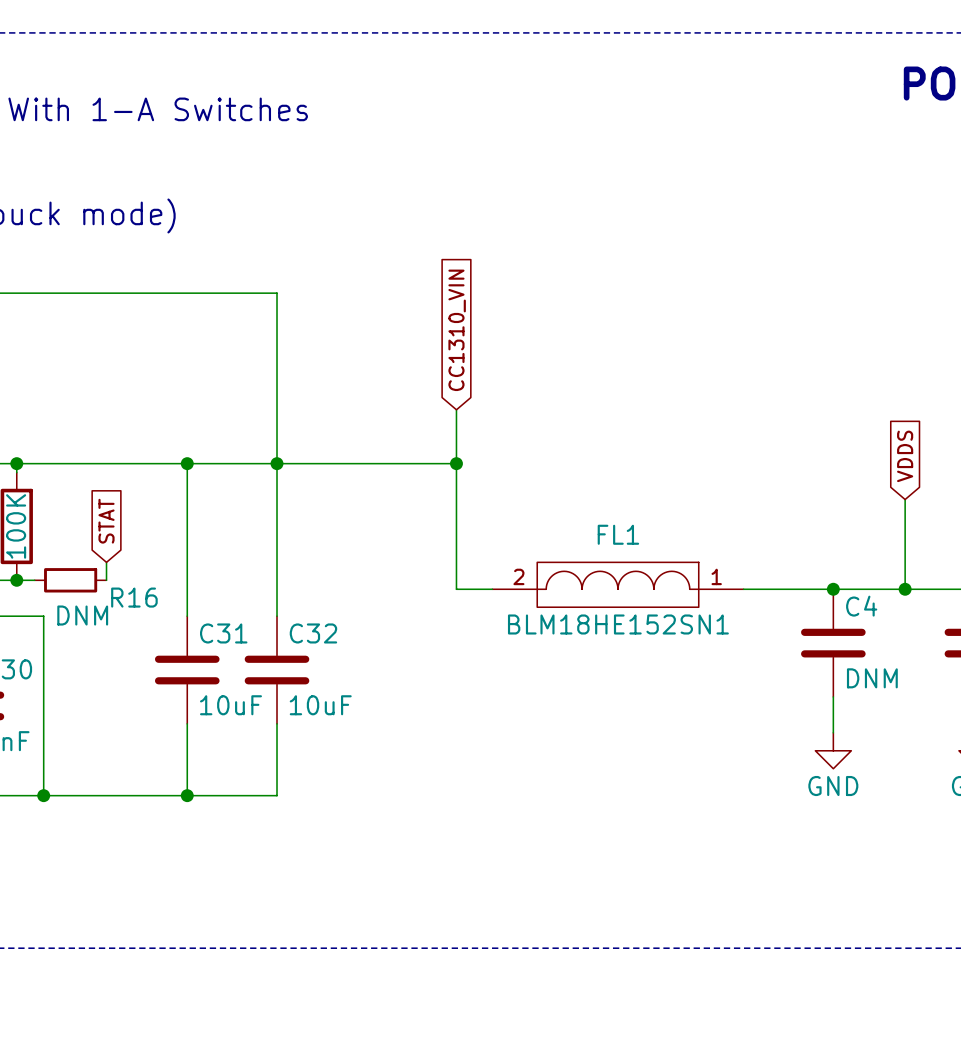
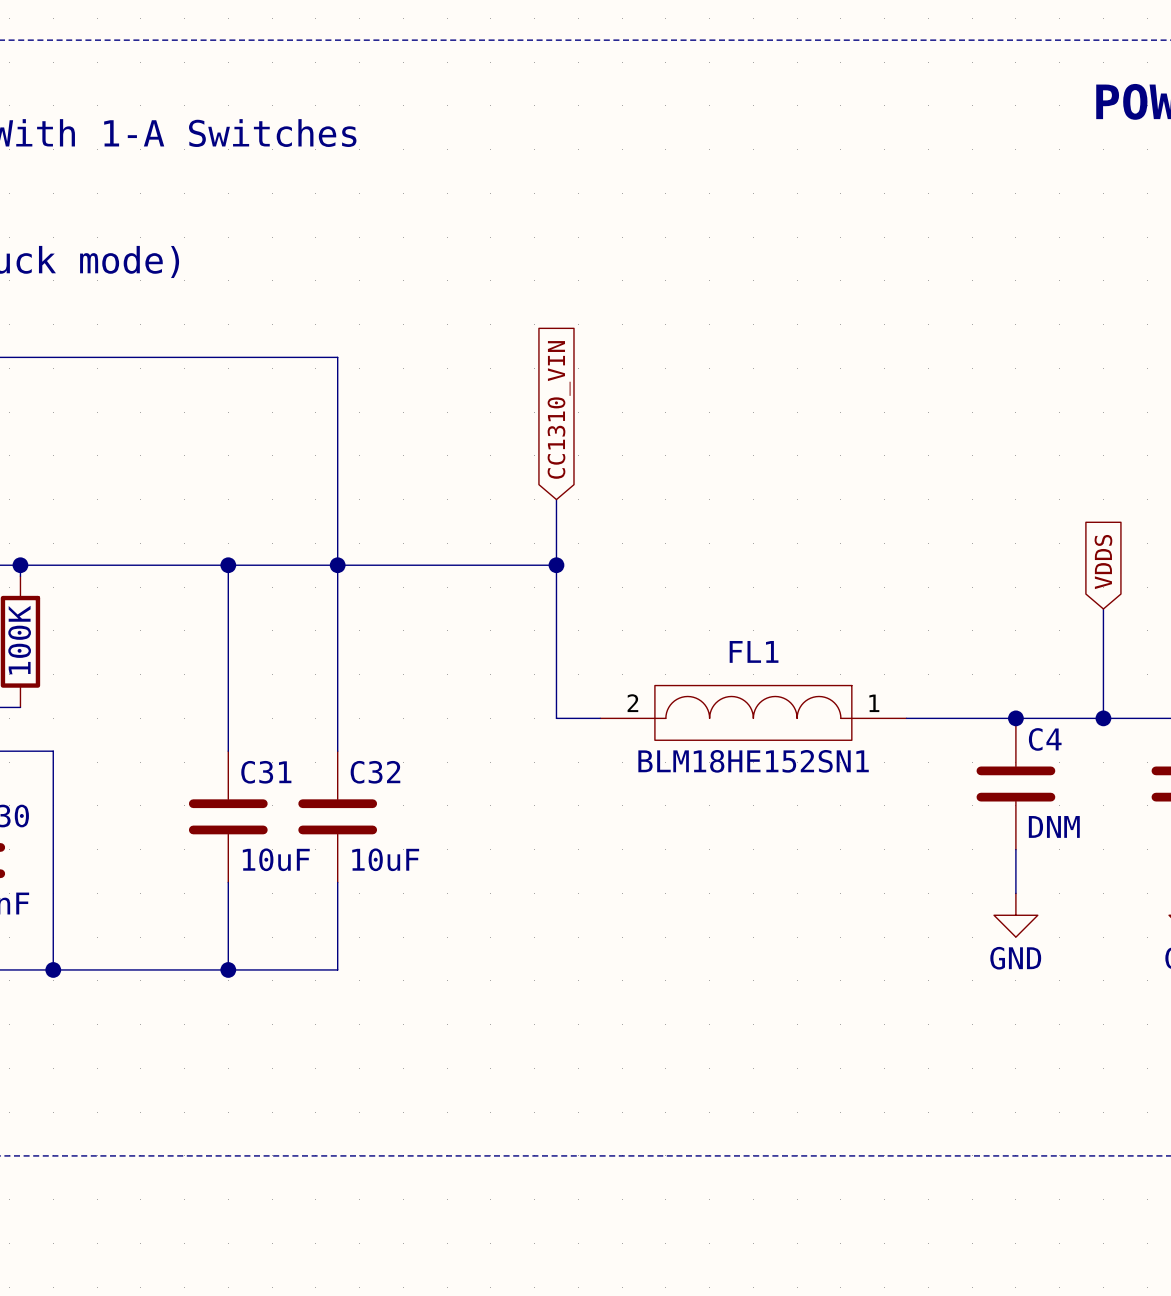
global label: STAT (106, 521) -> none
wire: (106, 562) (106, 580) -> none
wire: (16, 580) (34, 580) -> none
junction: (16, 580) -> none
R16: DNM (70, 580) -> none

